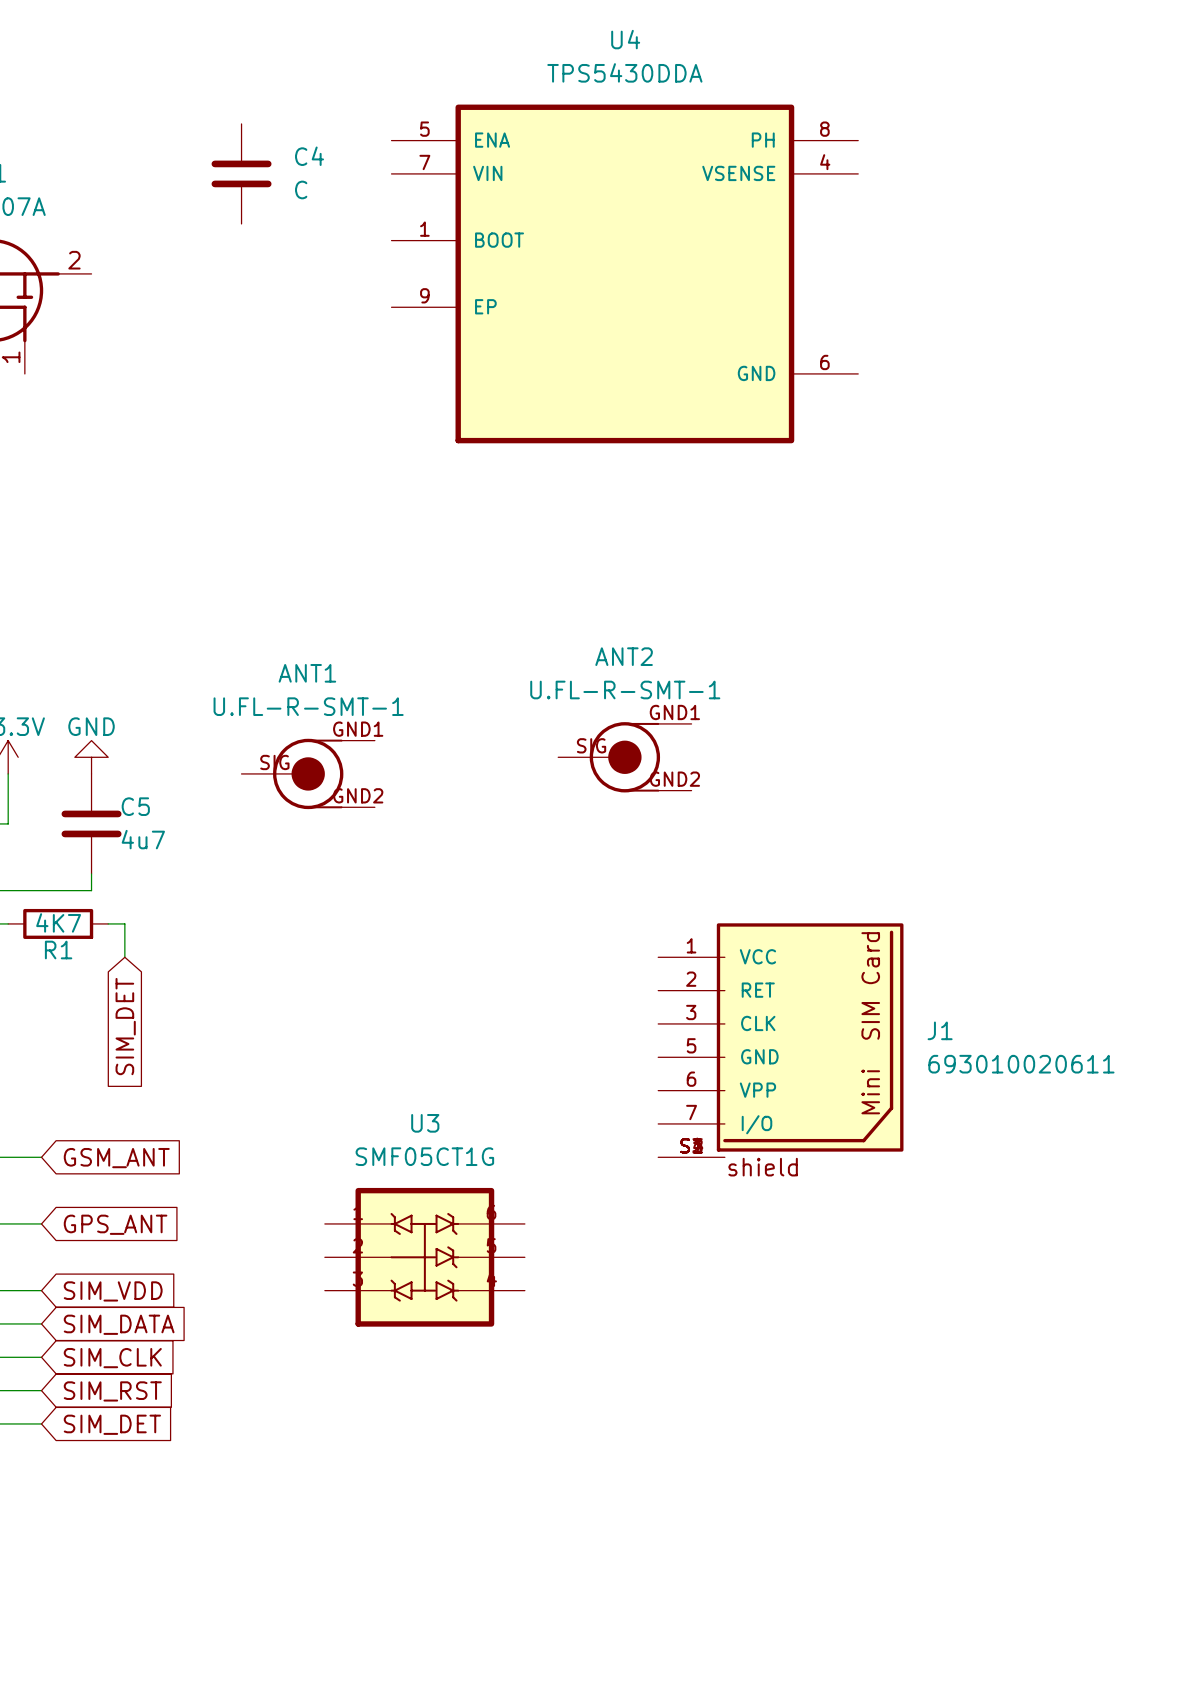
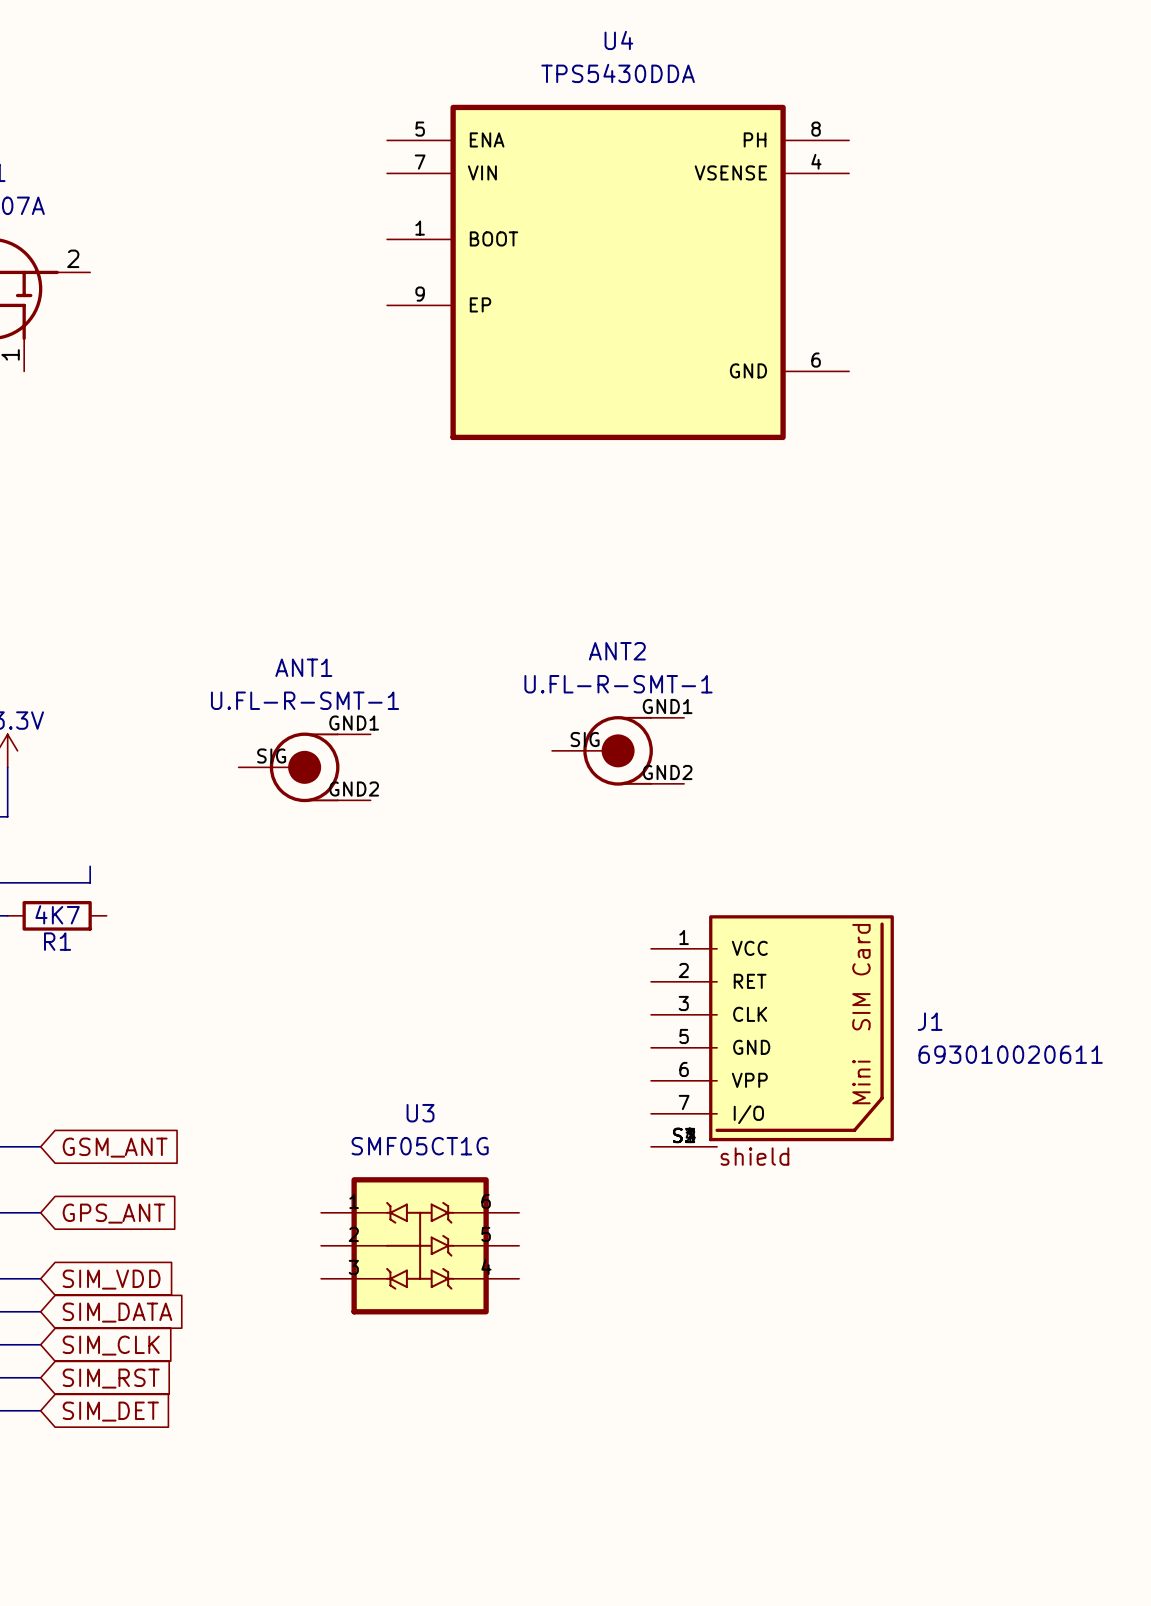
C4: C (241, 173) -> none
power symbol: GND (91, 757) -> none
C5: 4u7 (91, 823) -> none
wire: (108, 923) (124, 923) (124, 957) -> none
global label: SIM_DET (125, 1026) -> none

